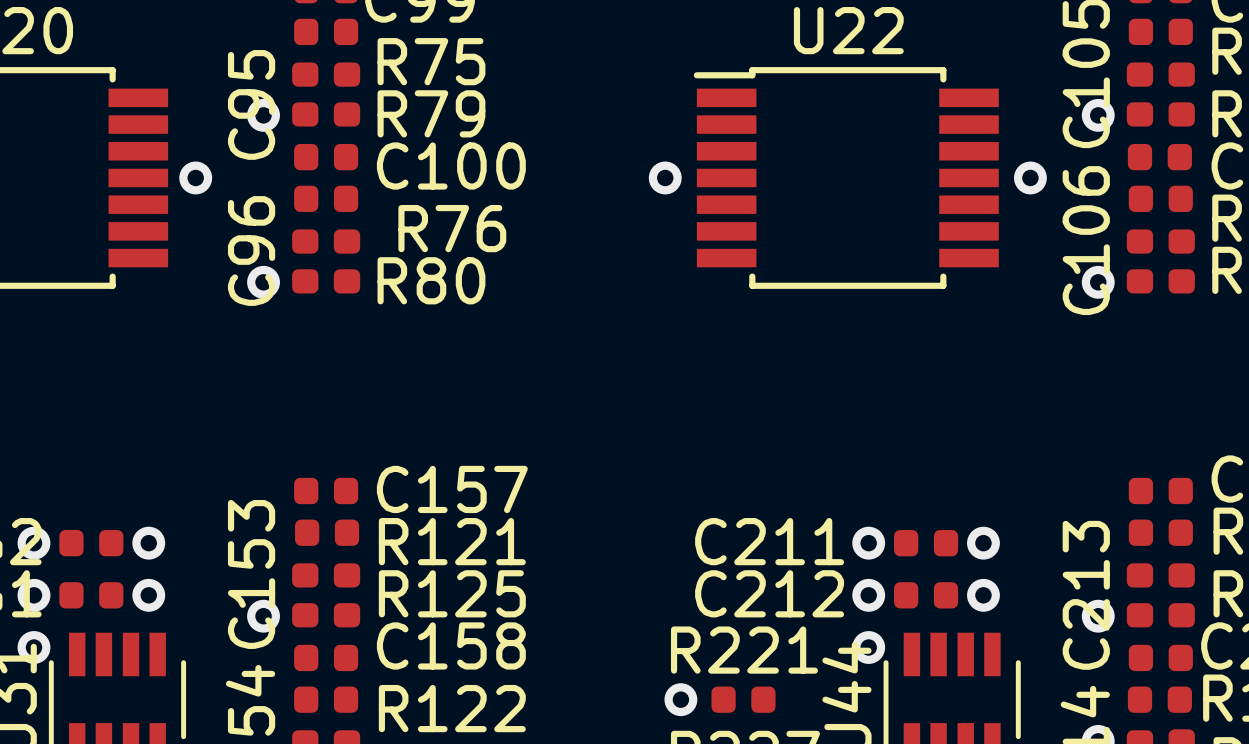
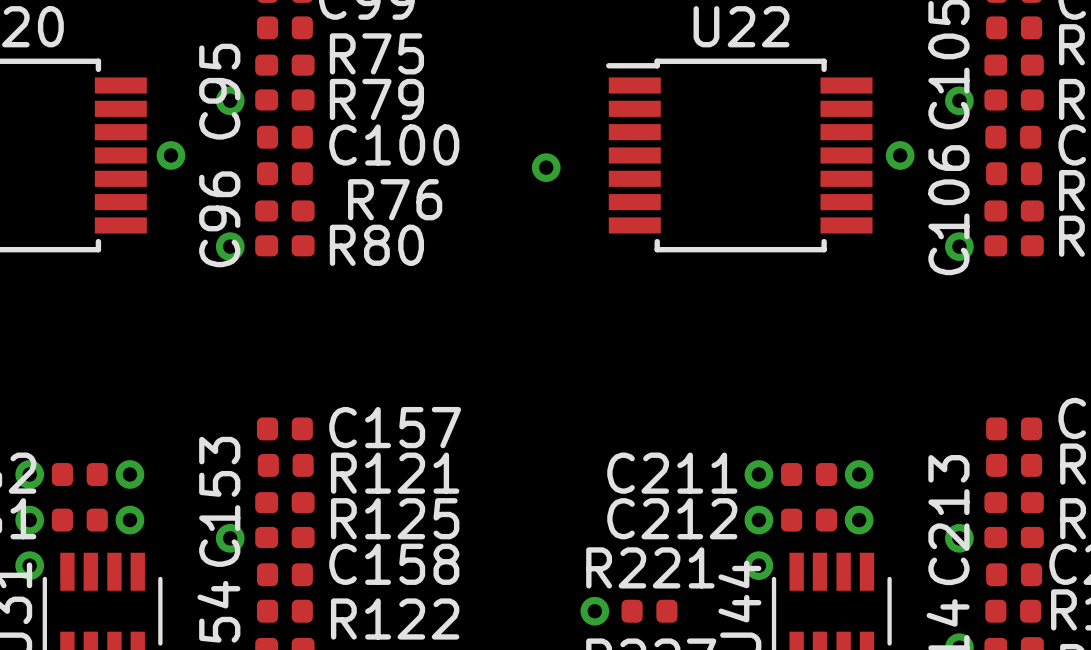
via position: (665, 177) -> (546, 167)

